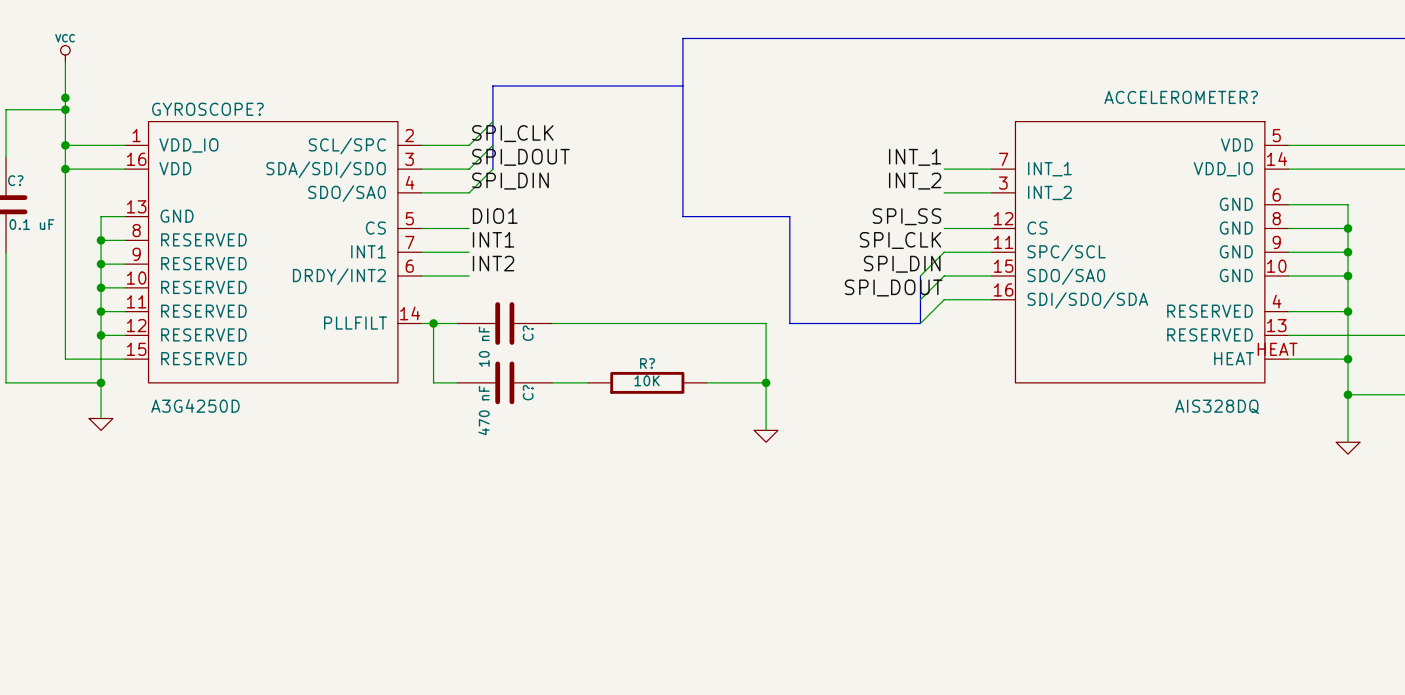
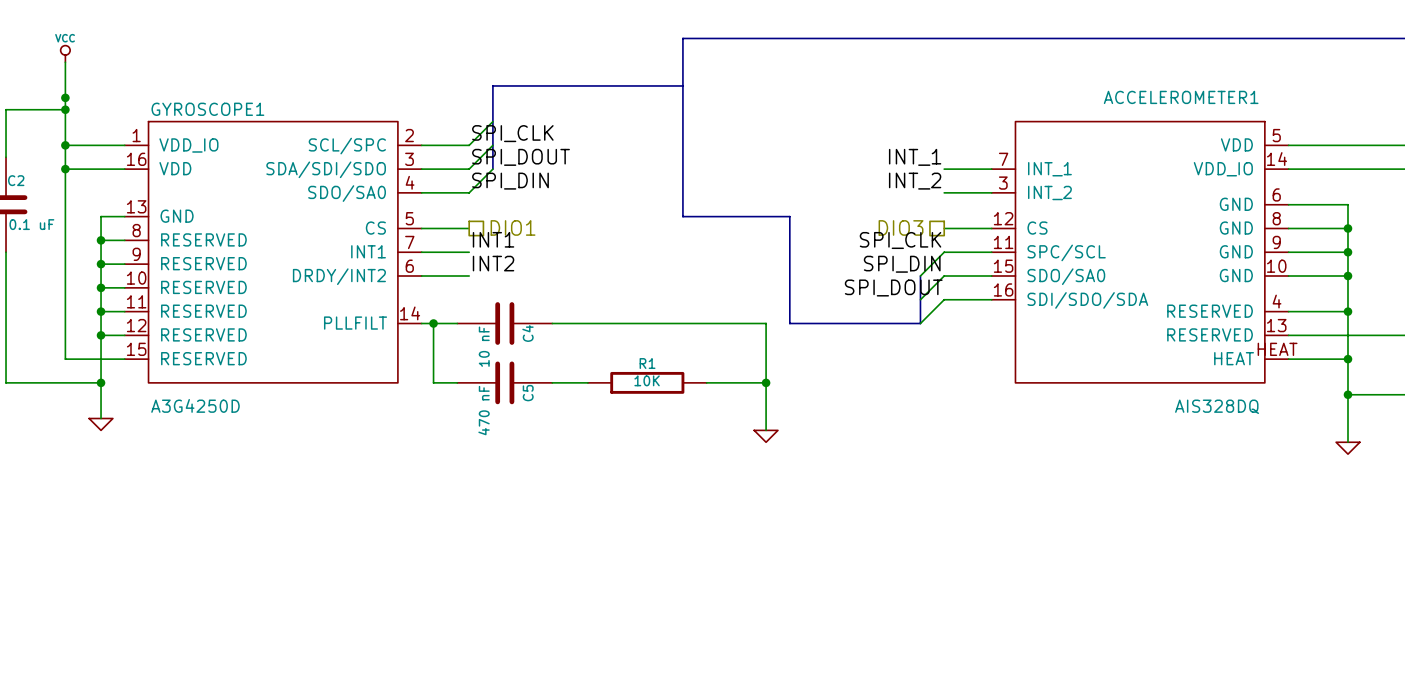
ACCELEROMETER? name: ACCELEROMETER? (1181, 97) -> ACCELEROMETER1 (1181, 97)
GYROSCOPE? name: GYROSCOPE? (207, 109) -> GYROSCOPE1 (207, 109)
C? name: C? (15, 180) -> C2 (16, 180)
label: DIO1 (495, 216) -> none
label: SPI_SS (906, 216) -> none
hierarchical label: none -> DIO1 (513, 227)
hierarchical label: none -> DIO3 (901, 227)
C? name: C? (528, 333) -> C4 (527, 333)
R? name: R? (647, 363) -> R1 (647, 363)
C? name: C? (528, 392) -> C5 (528, 393)

